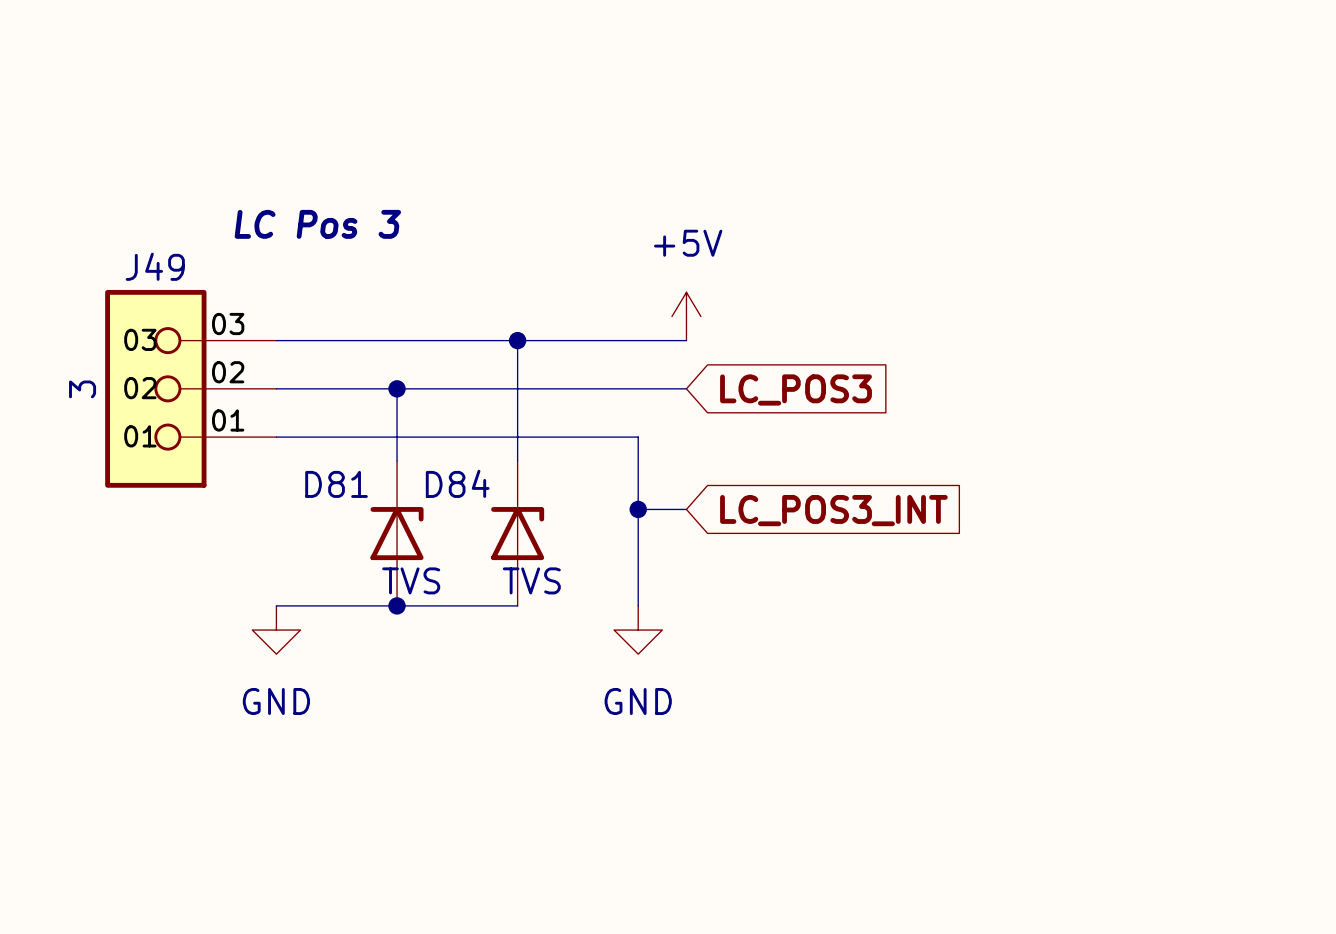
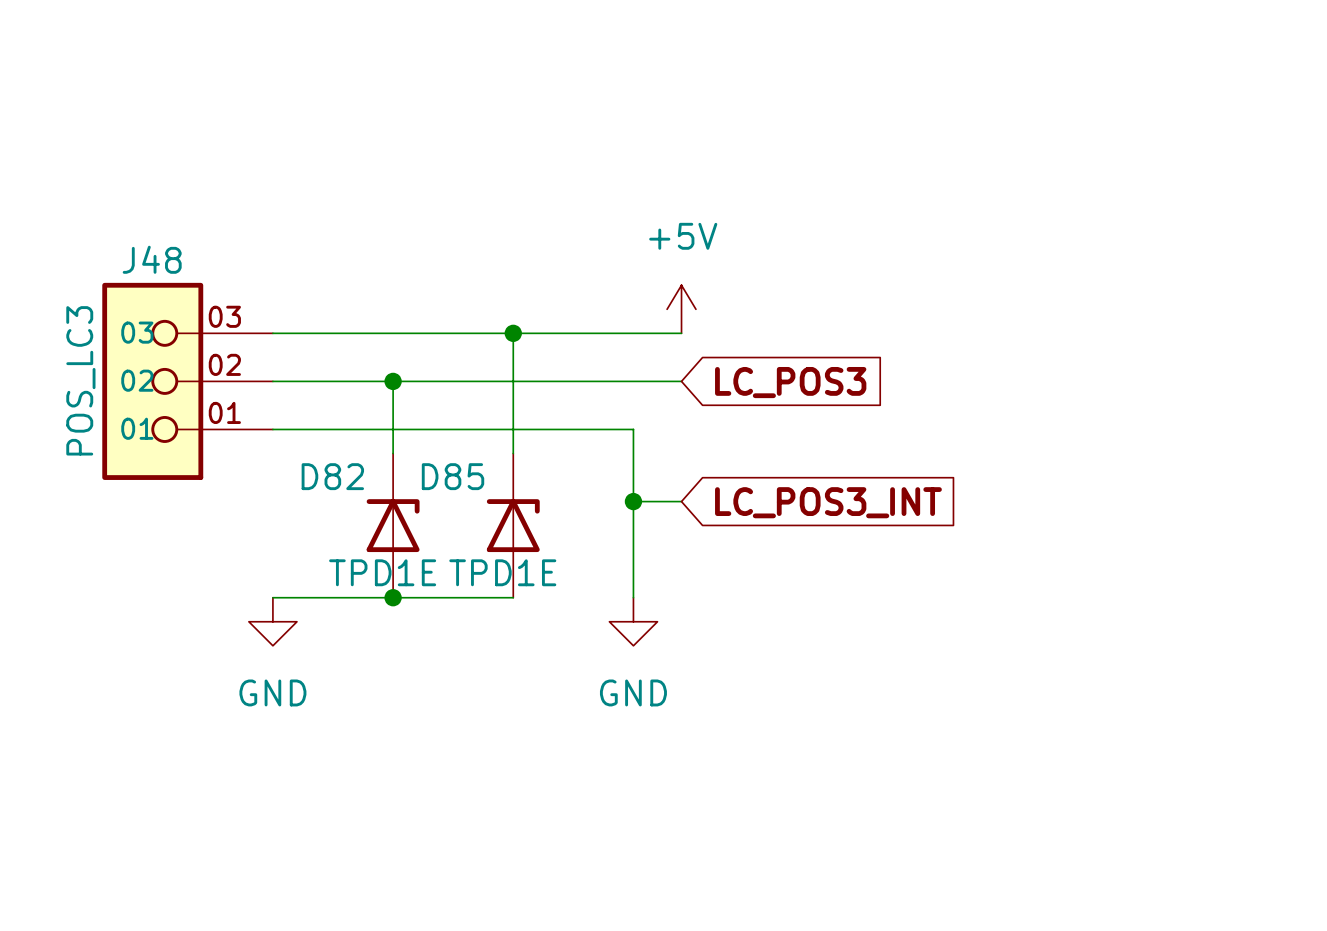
text: LC Pos 3 (317, 224) -> none
J49 name: J49 (155, 266) -> J48 (152, 259)
J49 value: 3 (82, 389) -> POS_LC3 (80, 380)
D84 name: D84 (457, 483) -> D85 (453, 476)
D81 name: D81 (336, 484) -> D82 (332, 476)
D81 value: TVS (411, 580) -> TPD1E (382, 572)
D84 value: TVS (531, 580) -> TPD1E (502, 572)

